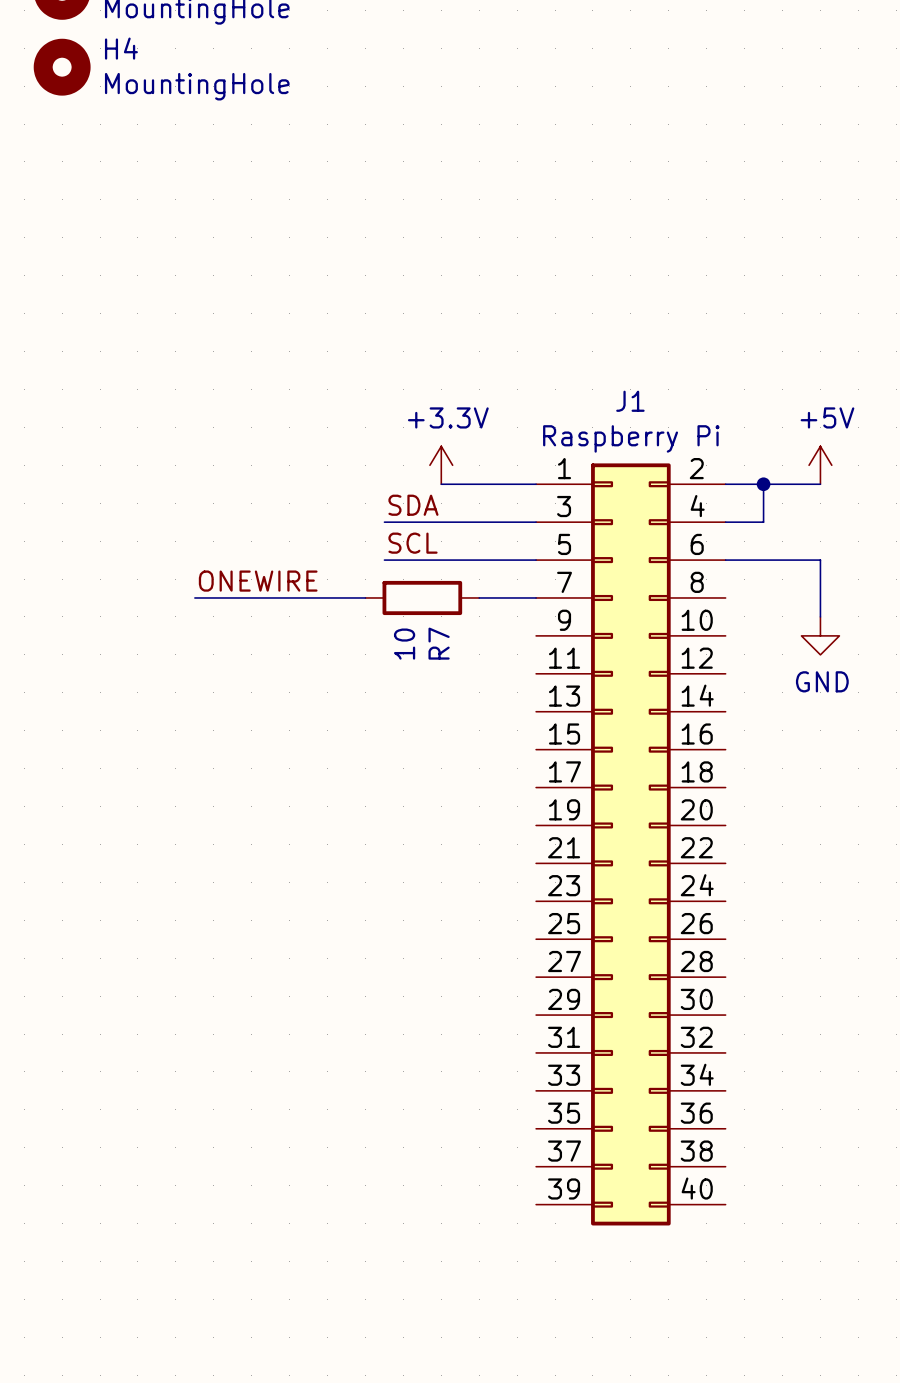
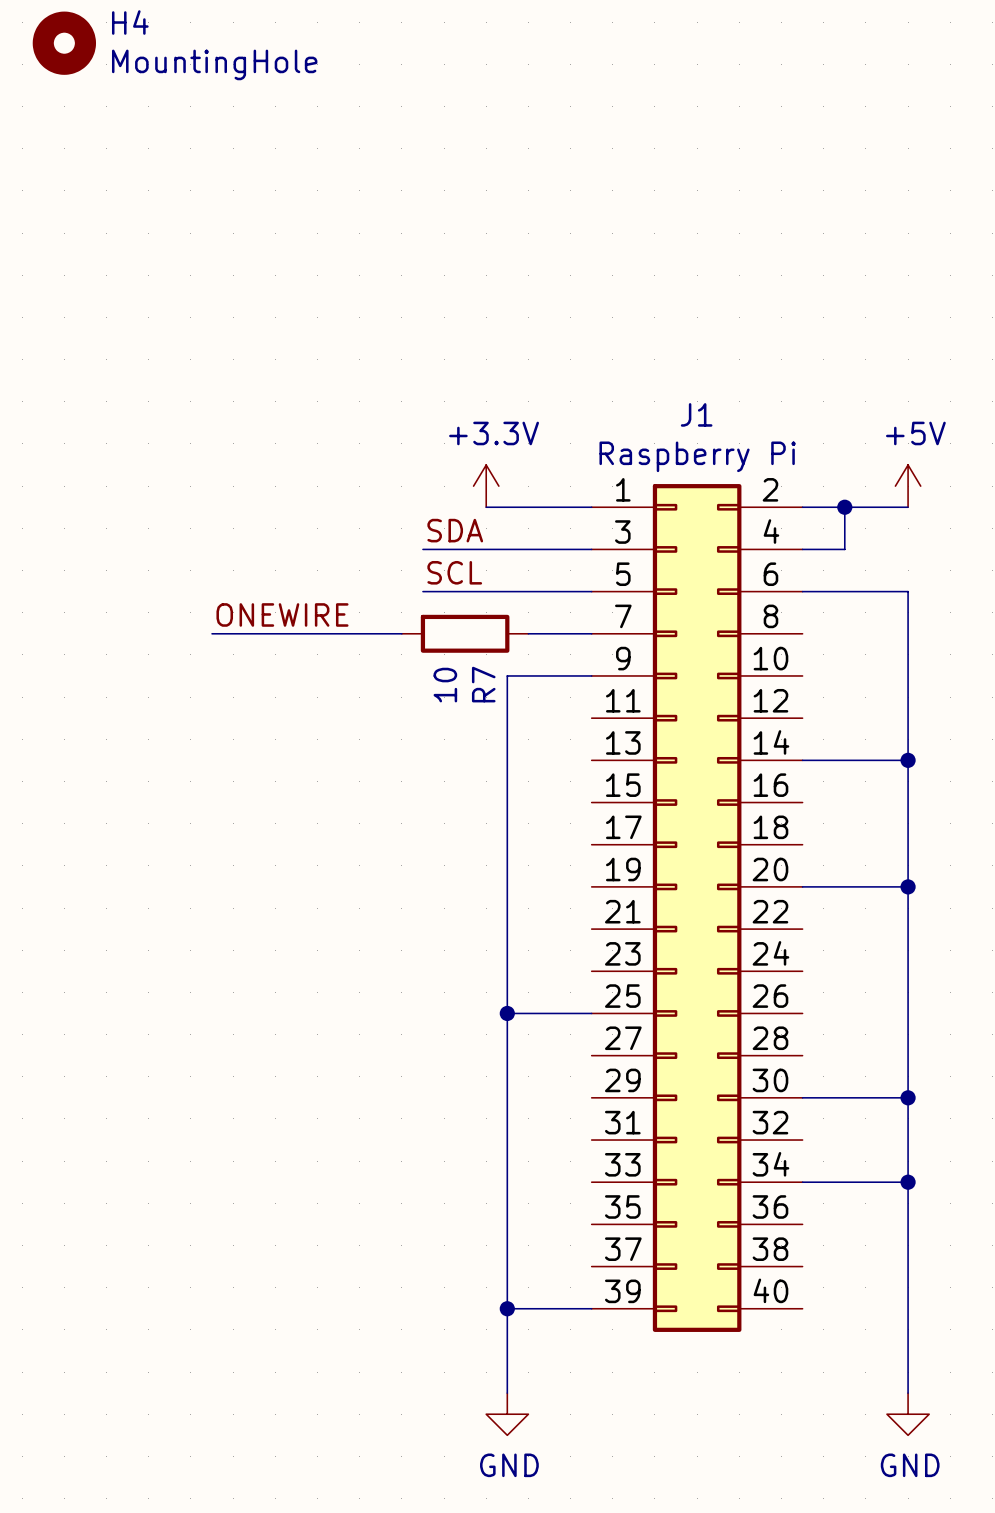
wire: none -> (908, 654) (908, 1393)
wire: none -> (591, 675) (507, 675) (507, 1393)
power symbol: GND (820, 635) -> none
wire: none -> (802, 760) (908, 760)
junction: none -> (908, 760)
wire: none -> (802, 886) (908, 886)
junction: none -> (908, 886)
wire: none -> (507, 1013) (591, 1013)
junction: none -> (507, 1013)
wire: none -> (802, 1097) (908, 1097)
junction: none -> (908, 1097)
wire: none -> (802, 1182) (908, 1182)
junction: none -> (908, 1182)
wire: none -> (507, 1308) (591, 1308)
junction: none -> (507, 1308)
power symbol: none -> GND (507, 1414)
power symbol: none -> GND (908, 1414)

